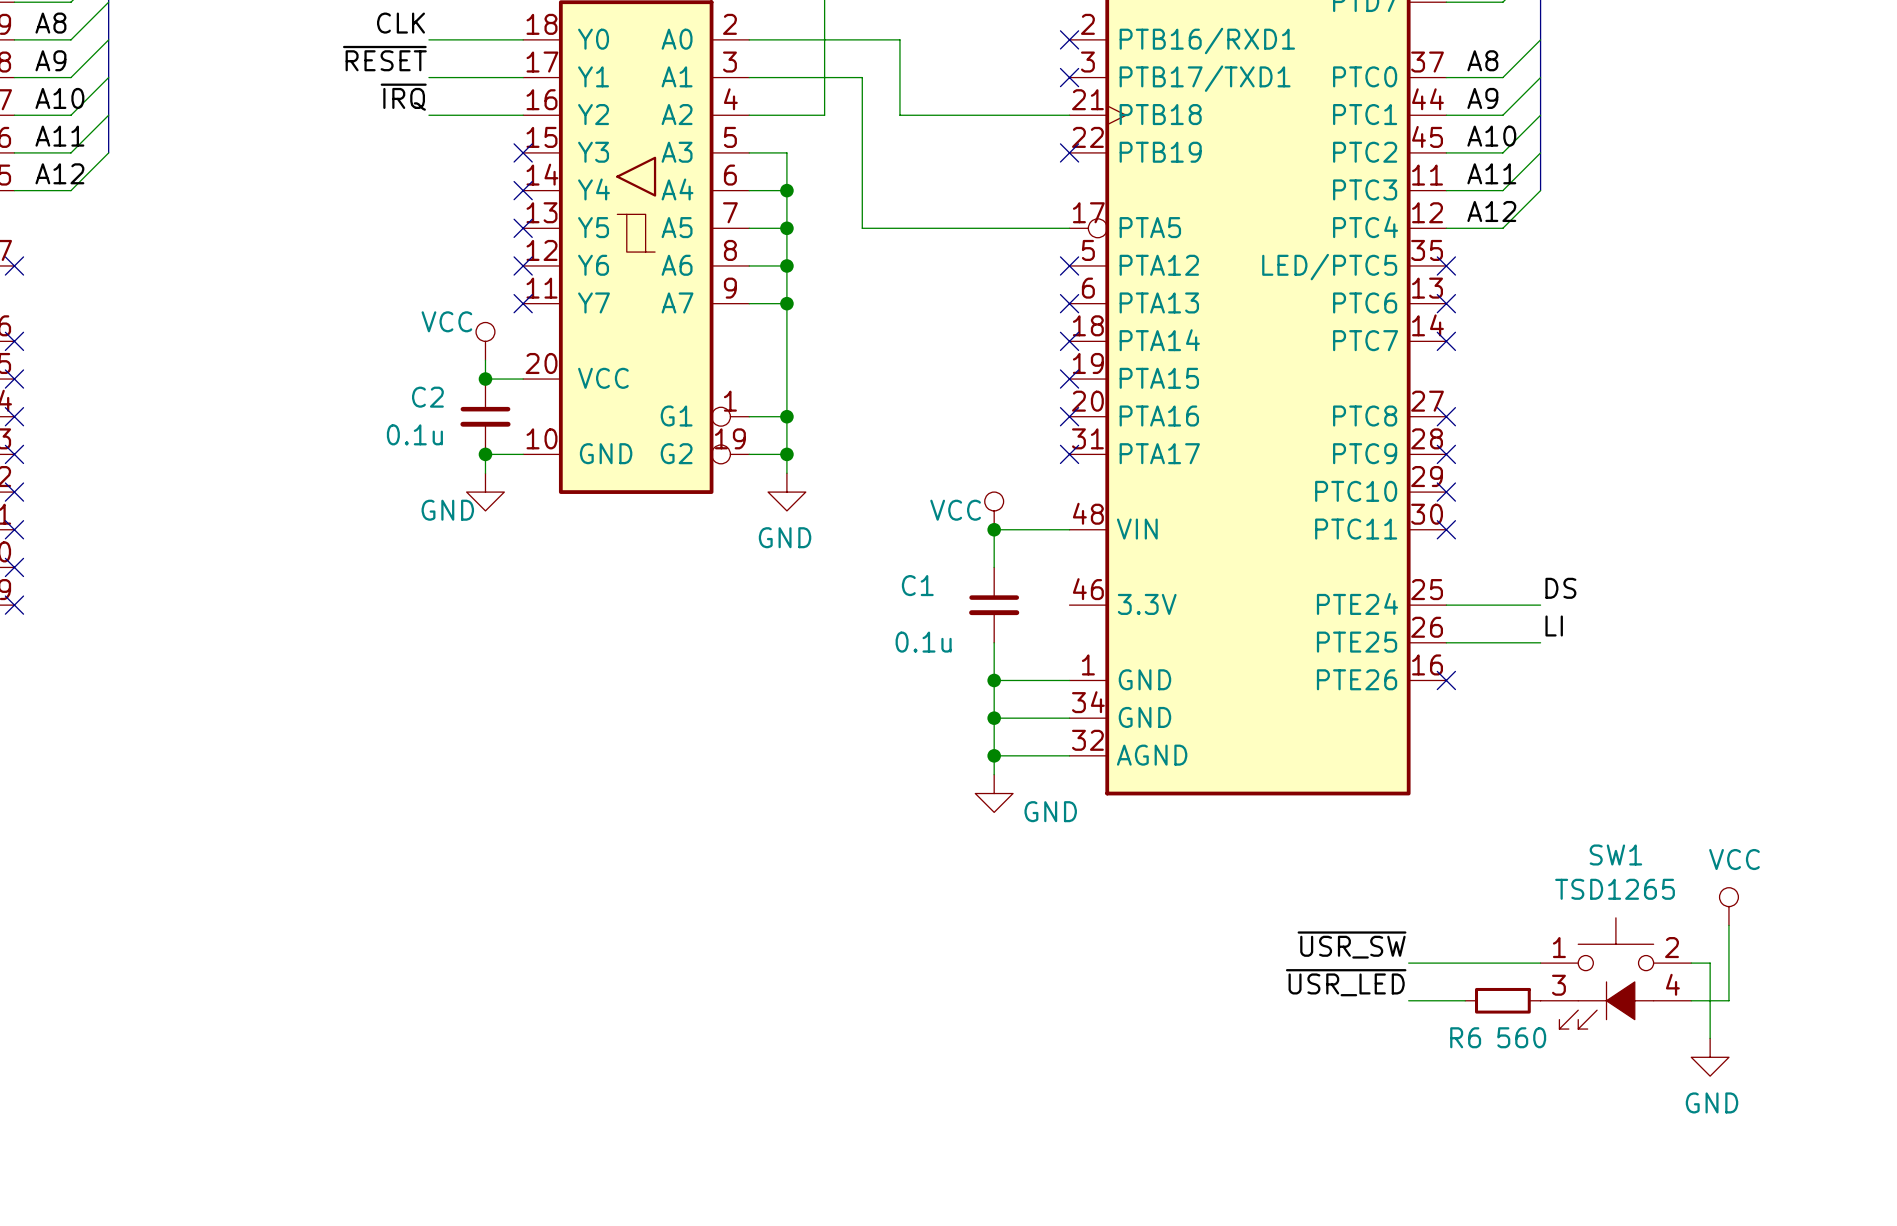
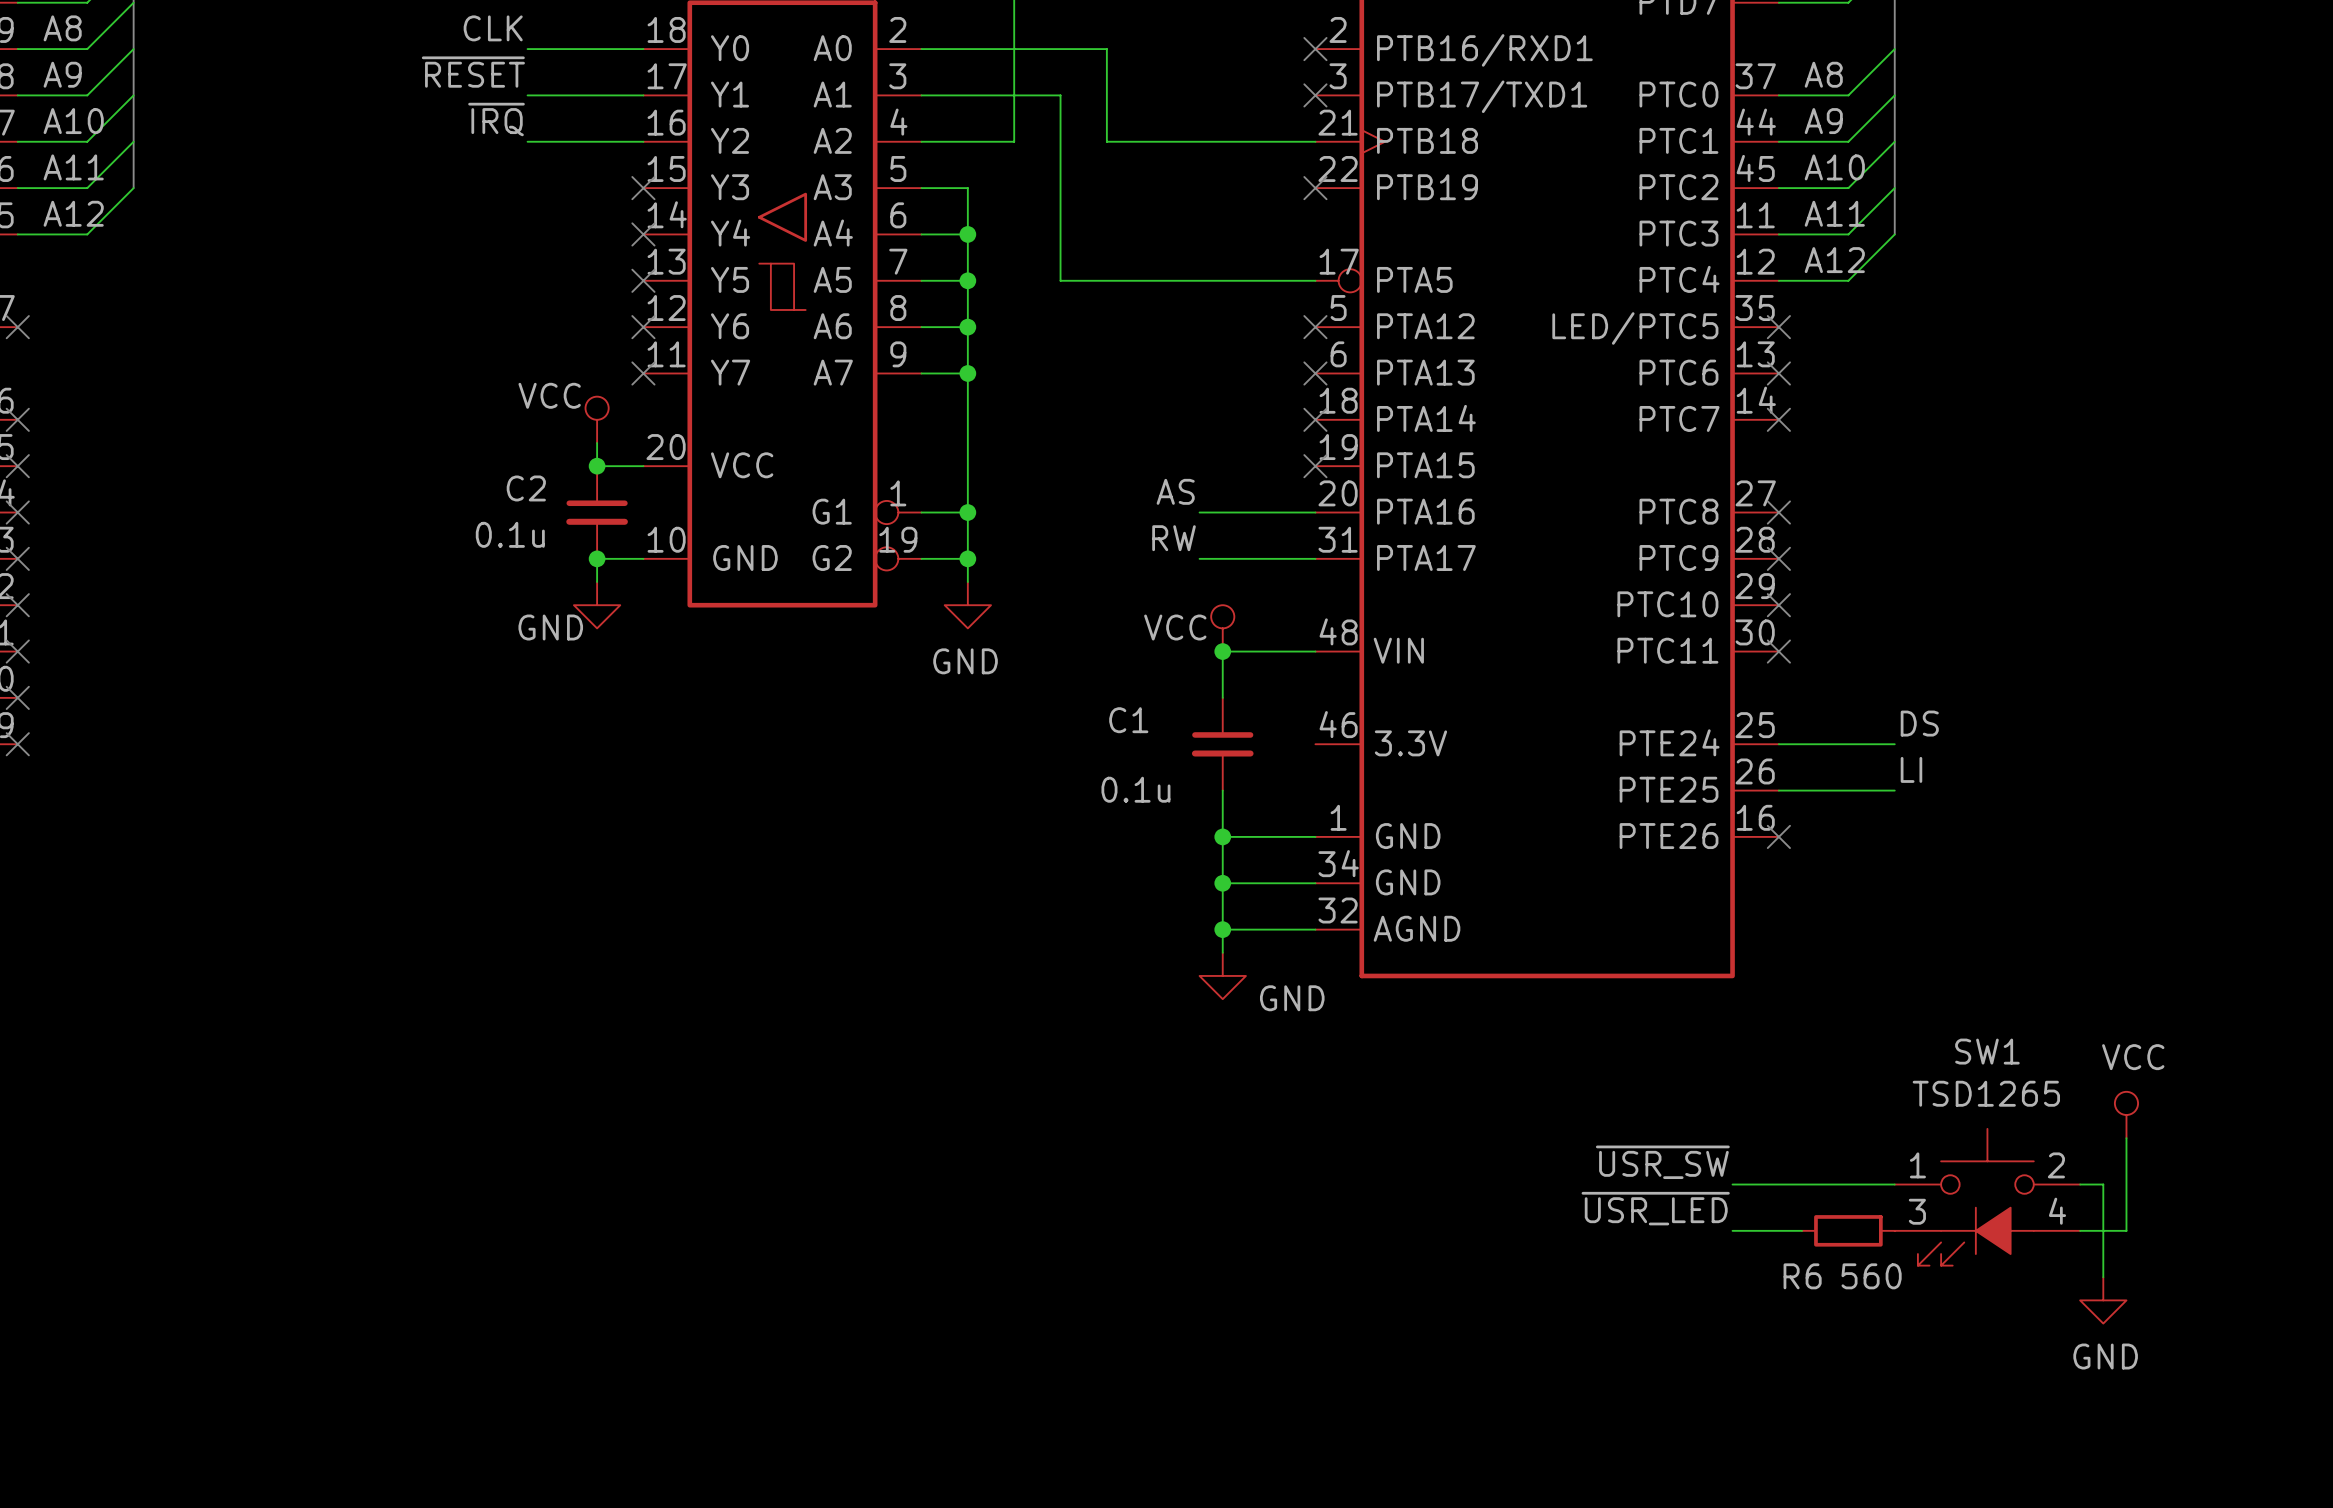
label: none -> AS (1175, 491)
wire: none -> (1199, 512) (1315, 512)
no-connect mark: (1069, 416) -> none
label: none -> RW (1174, 538)
wire: none -> (1199, 558) (1315, 558)
no-connect mark: (1069, 454) -> none

